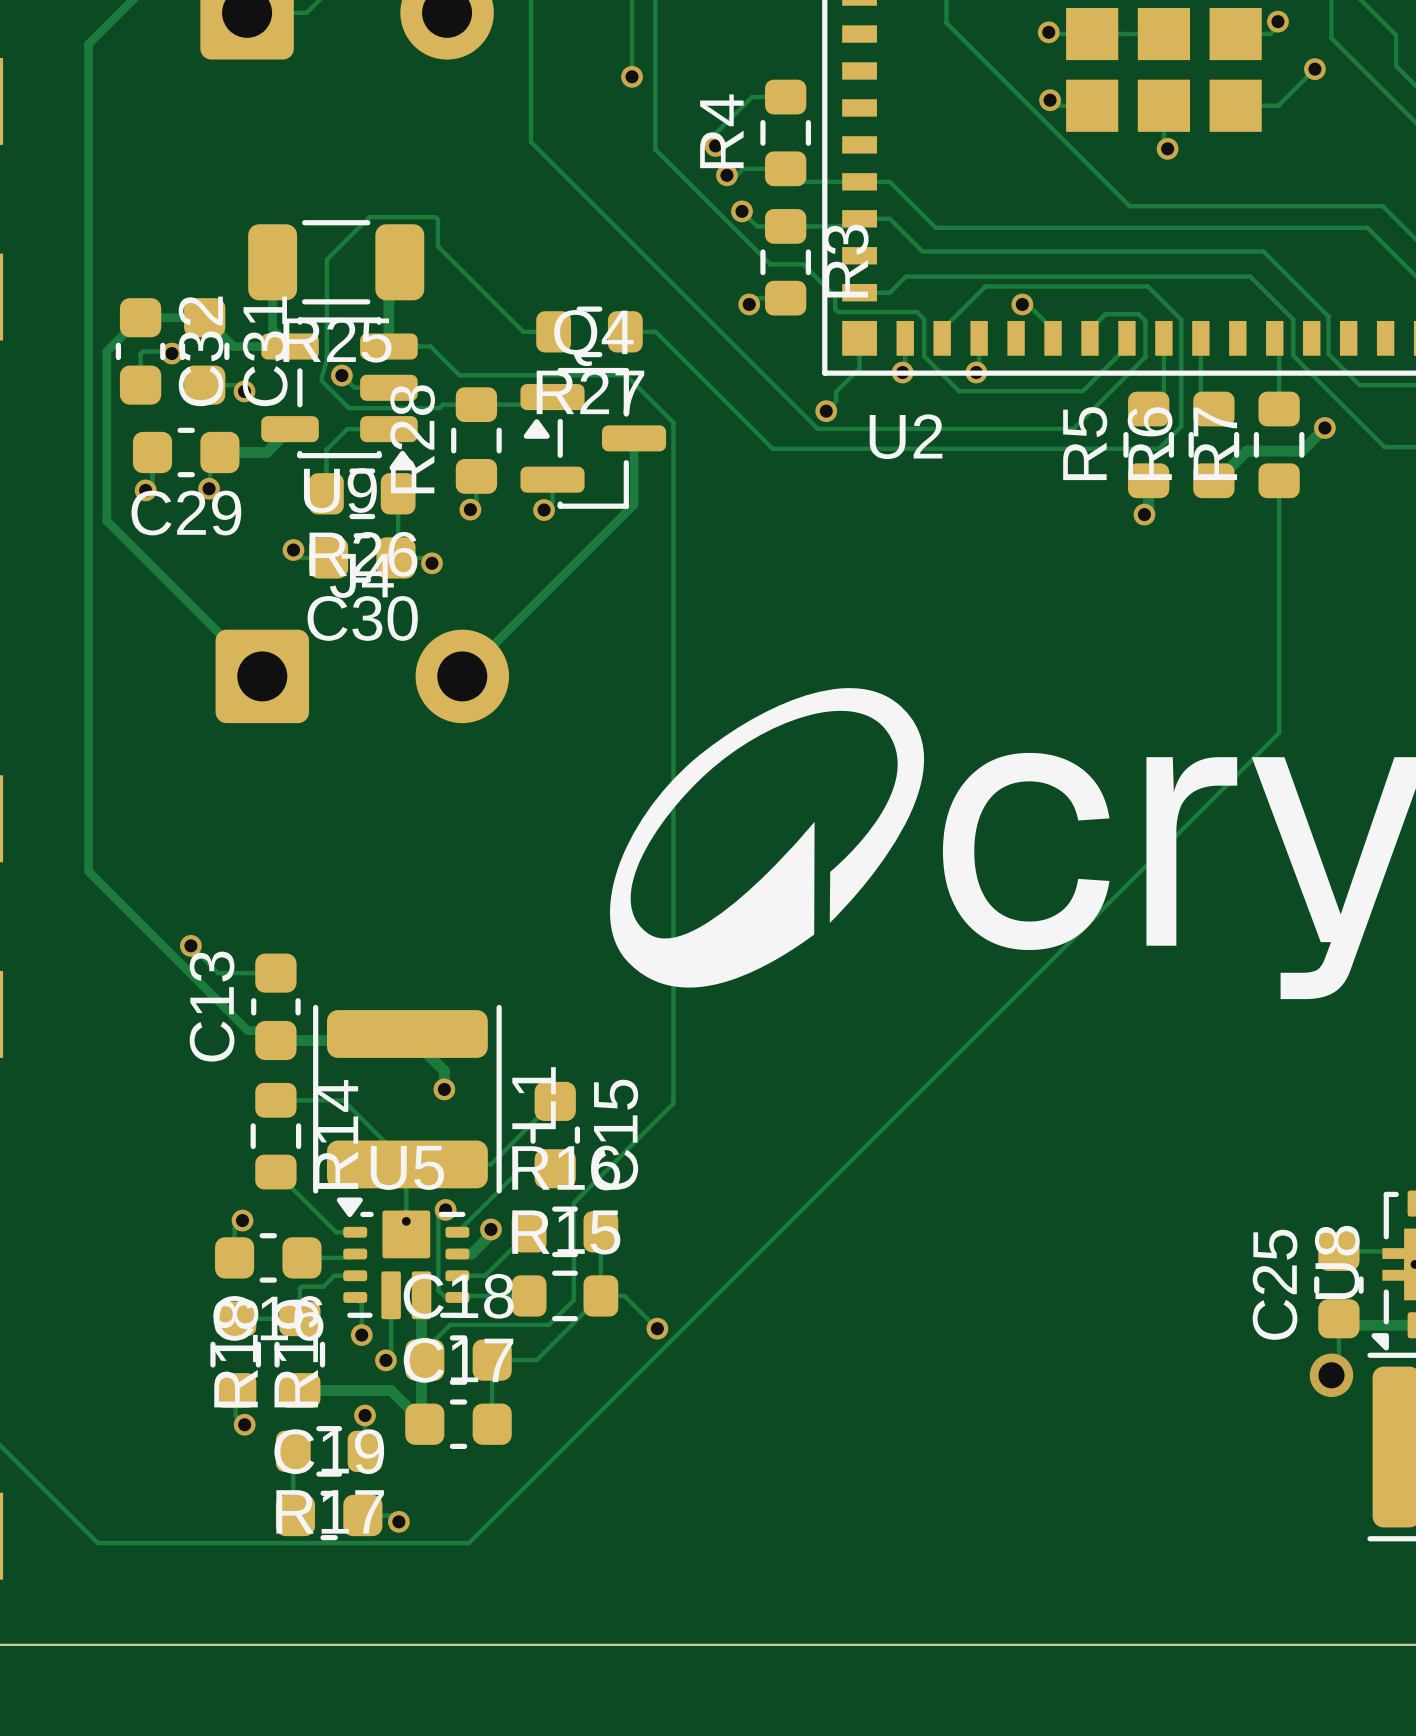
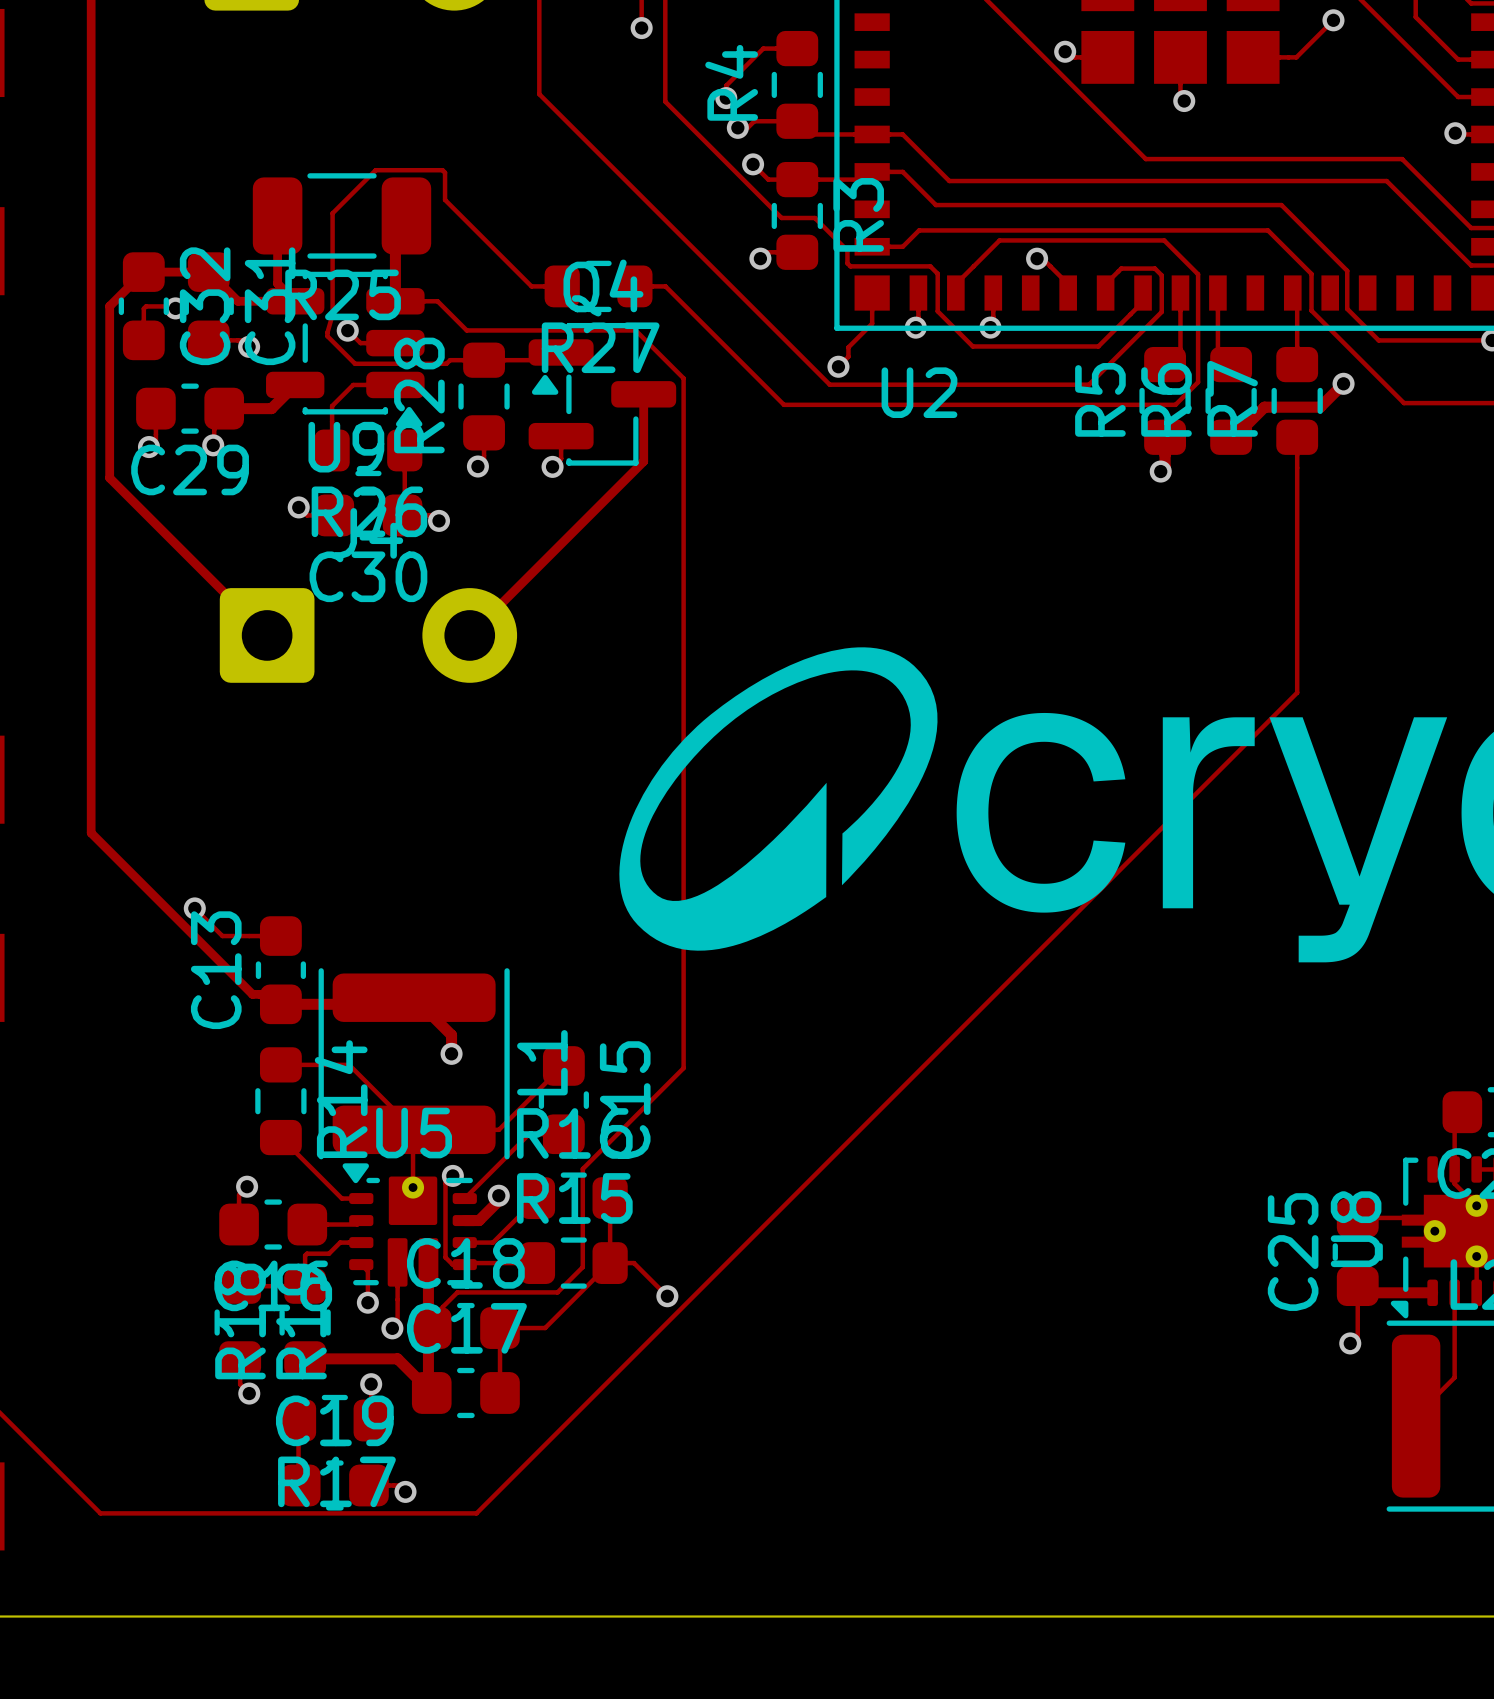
via size: [1309, 1353, 1354, 1398] -> [1339, 1332, 1362, 1355]

